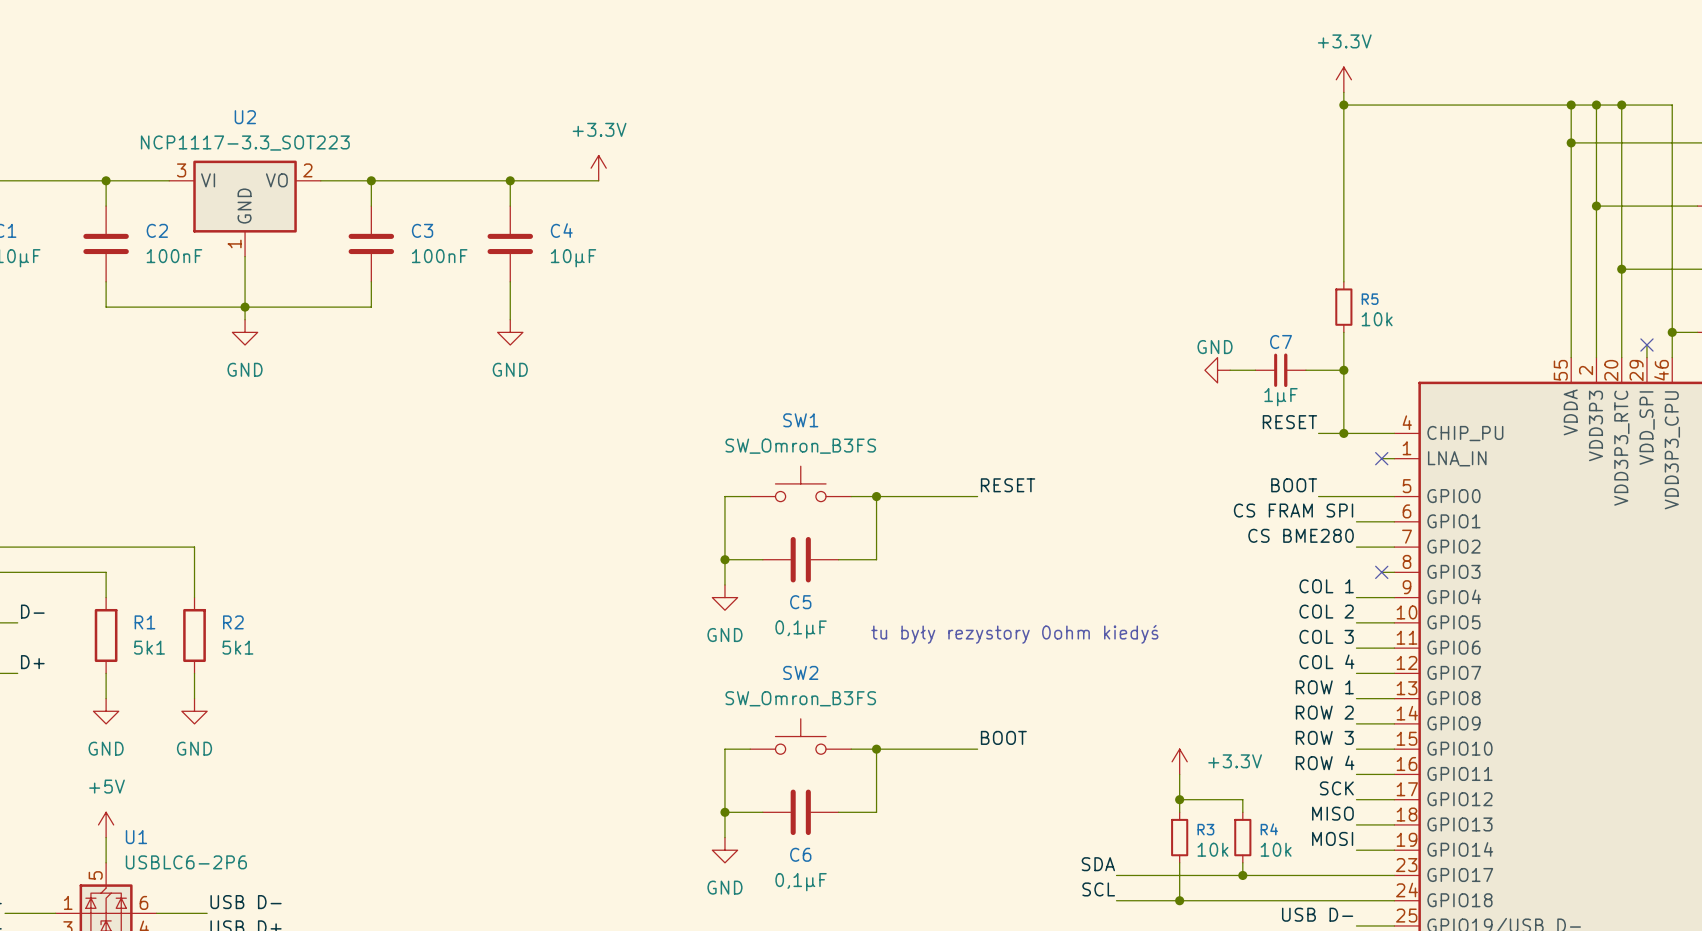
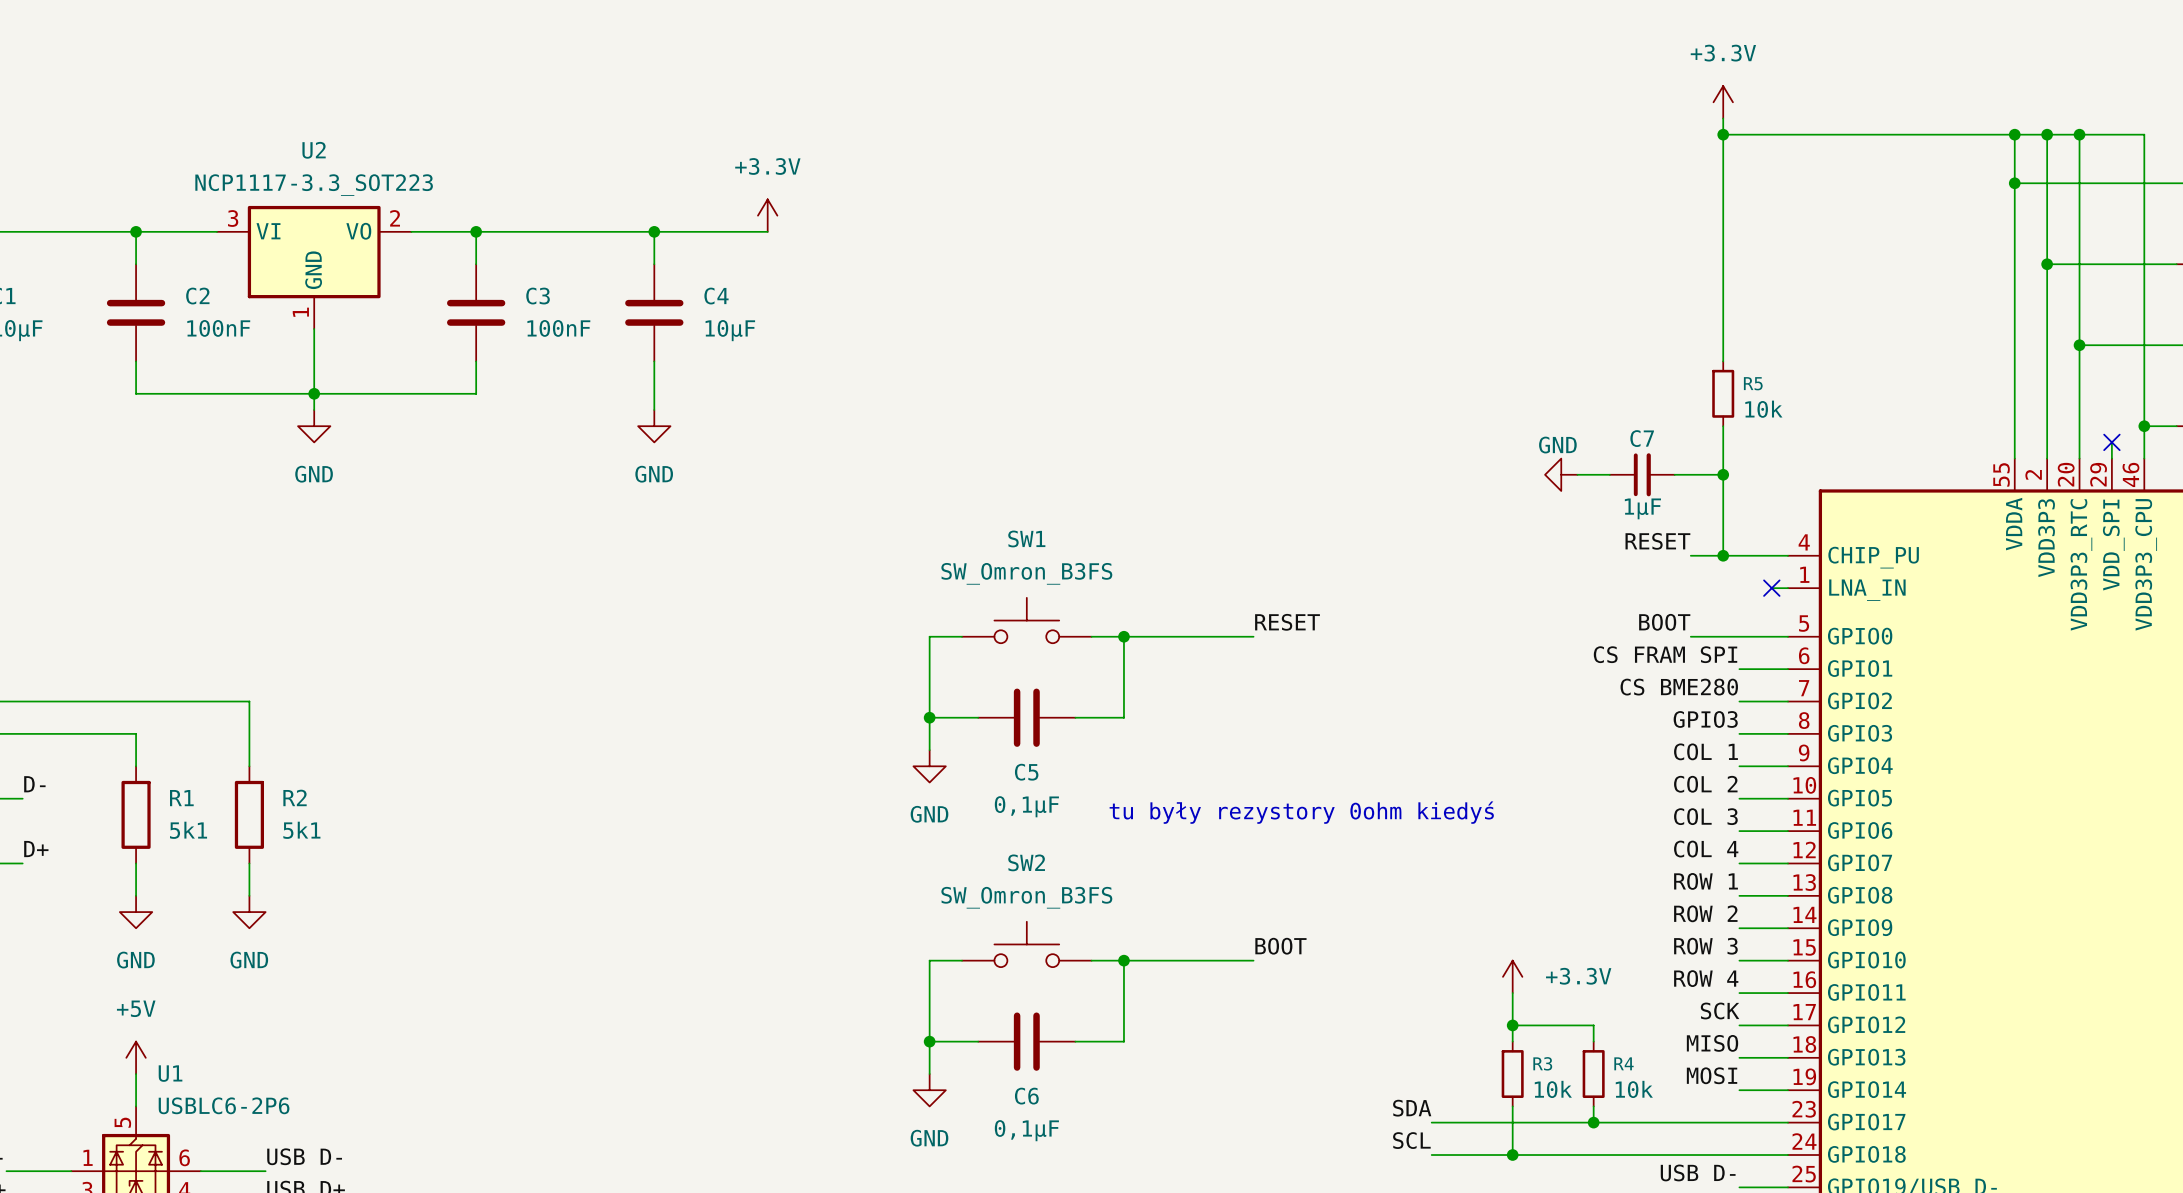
label: none -> GPIO3 (1705, 719)
wire: none -> (1739, 733) (1771, 733)
no-connect mark: (1381, 572) -> none

